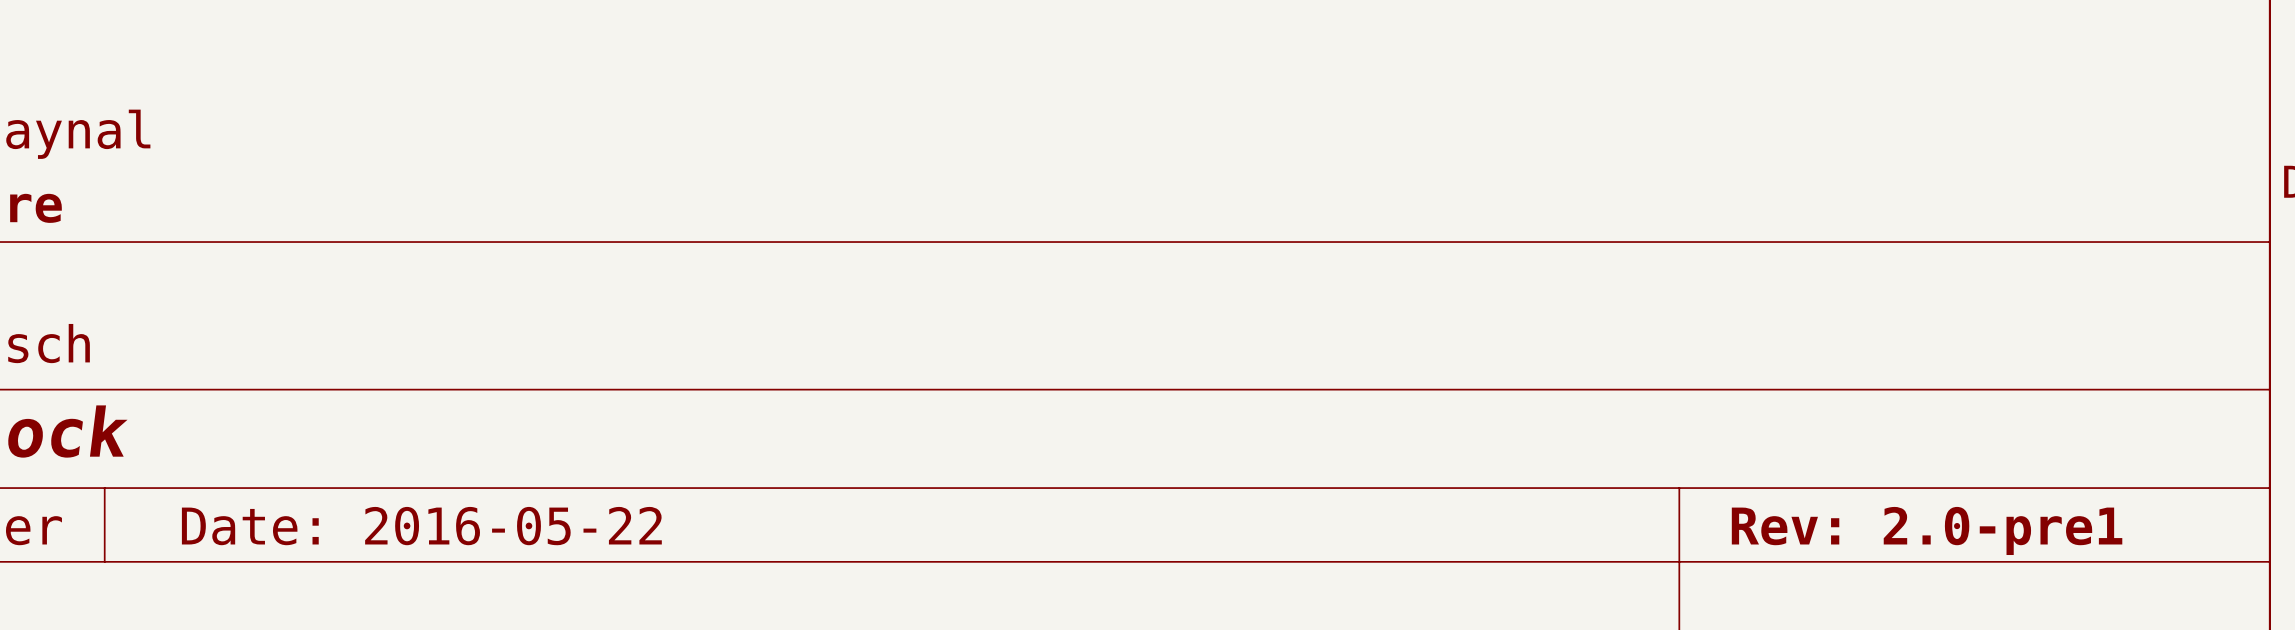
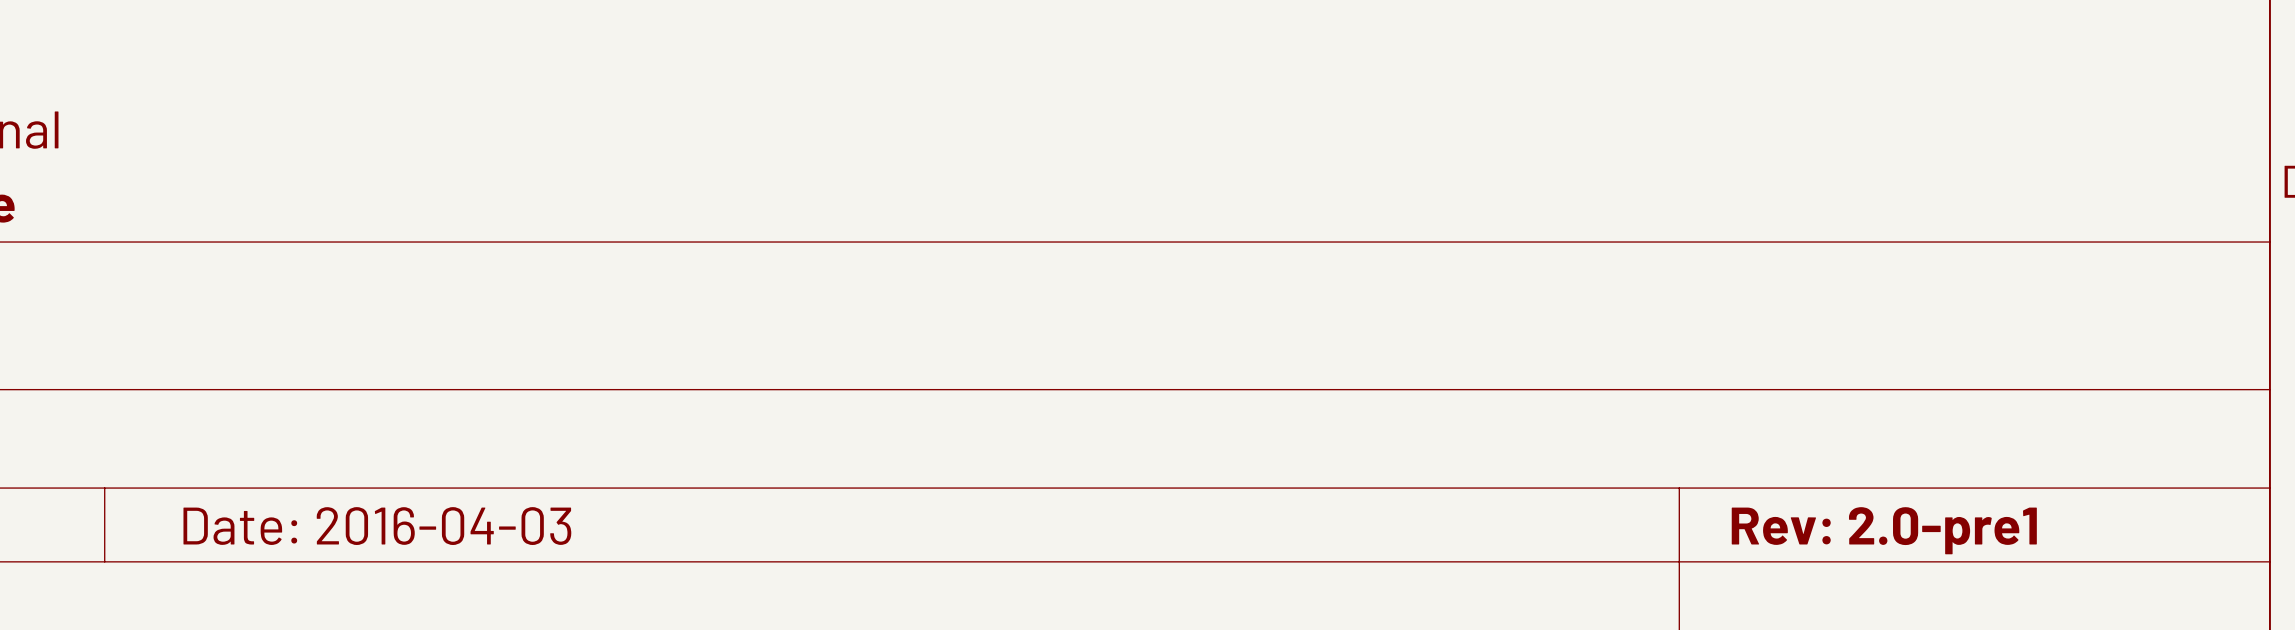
title block: Date: 2016-05-22 (421, 526) -> Date: 2016-04-03 (377, 526)

